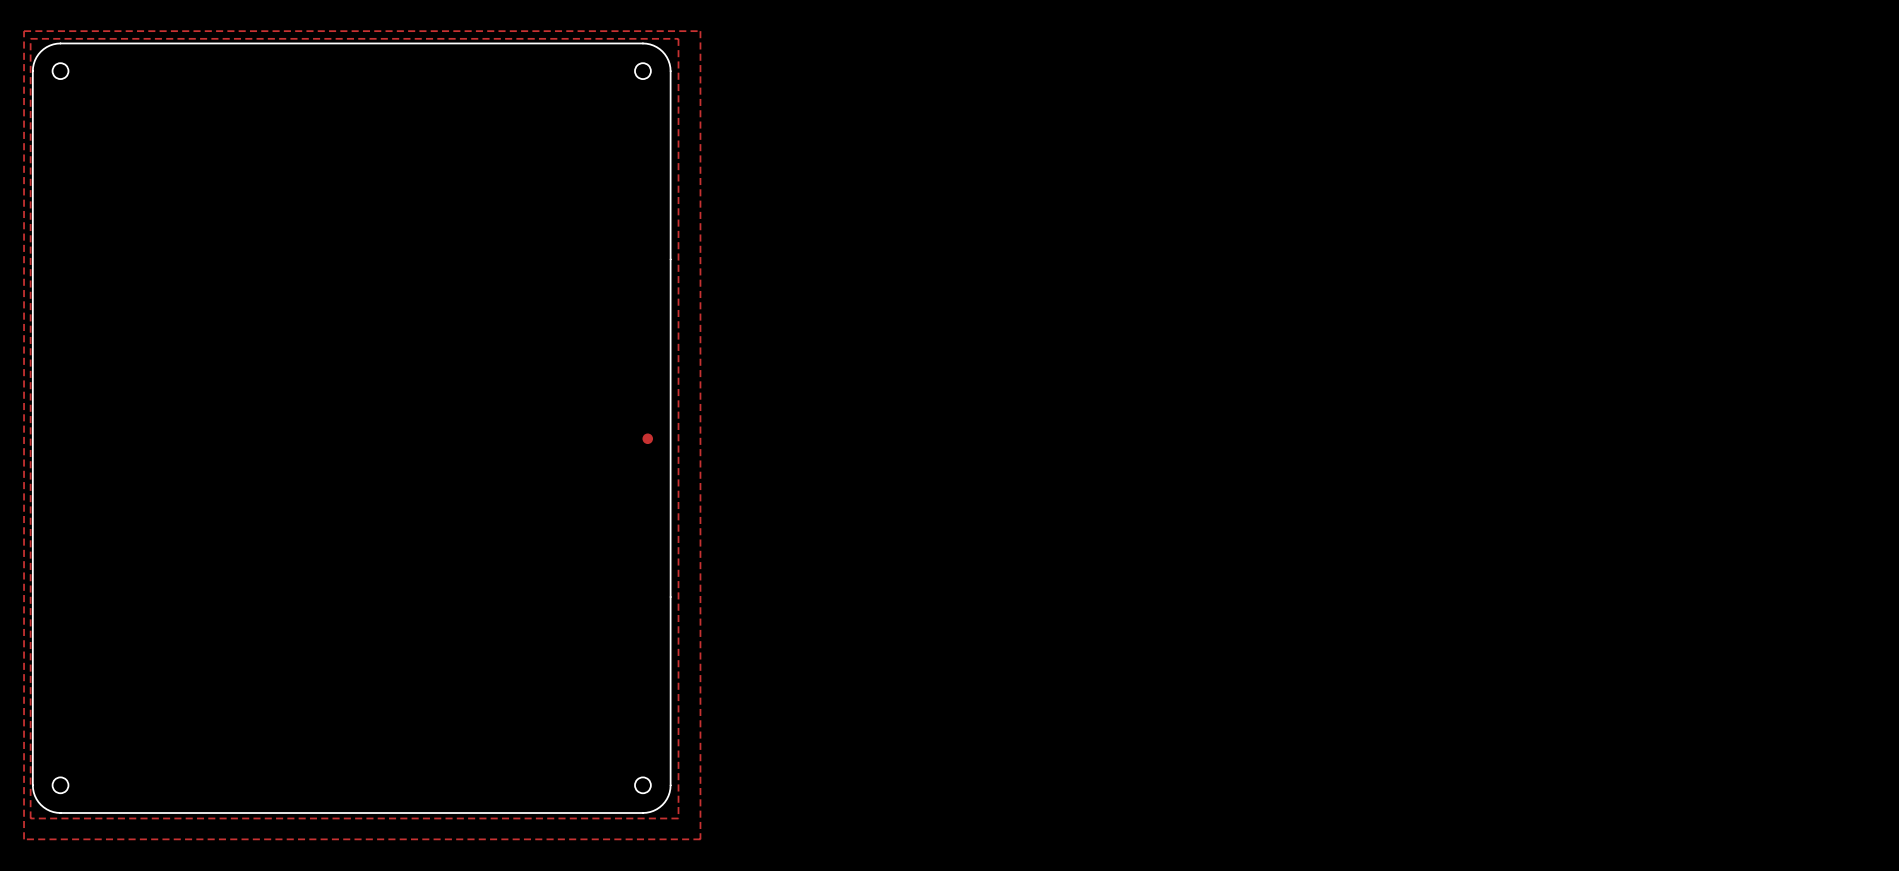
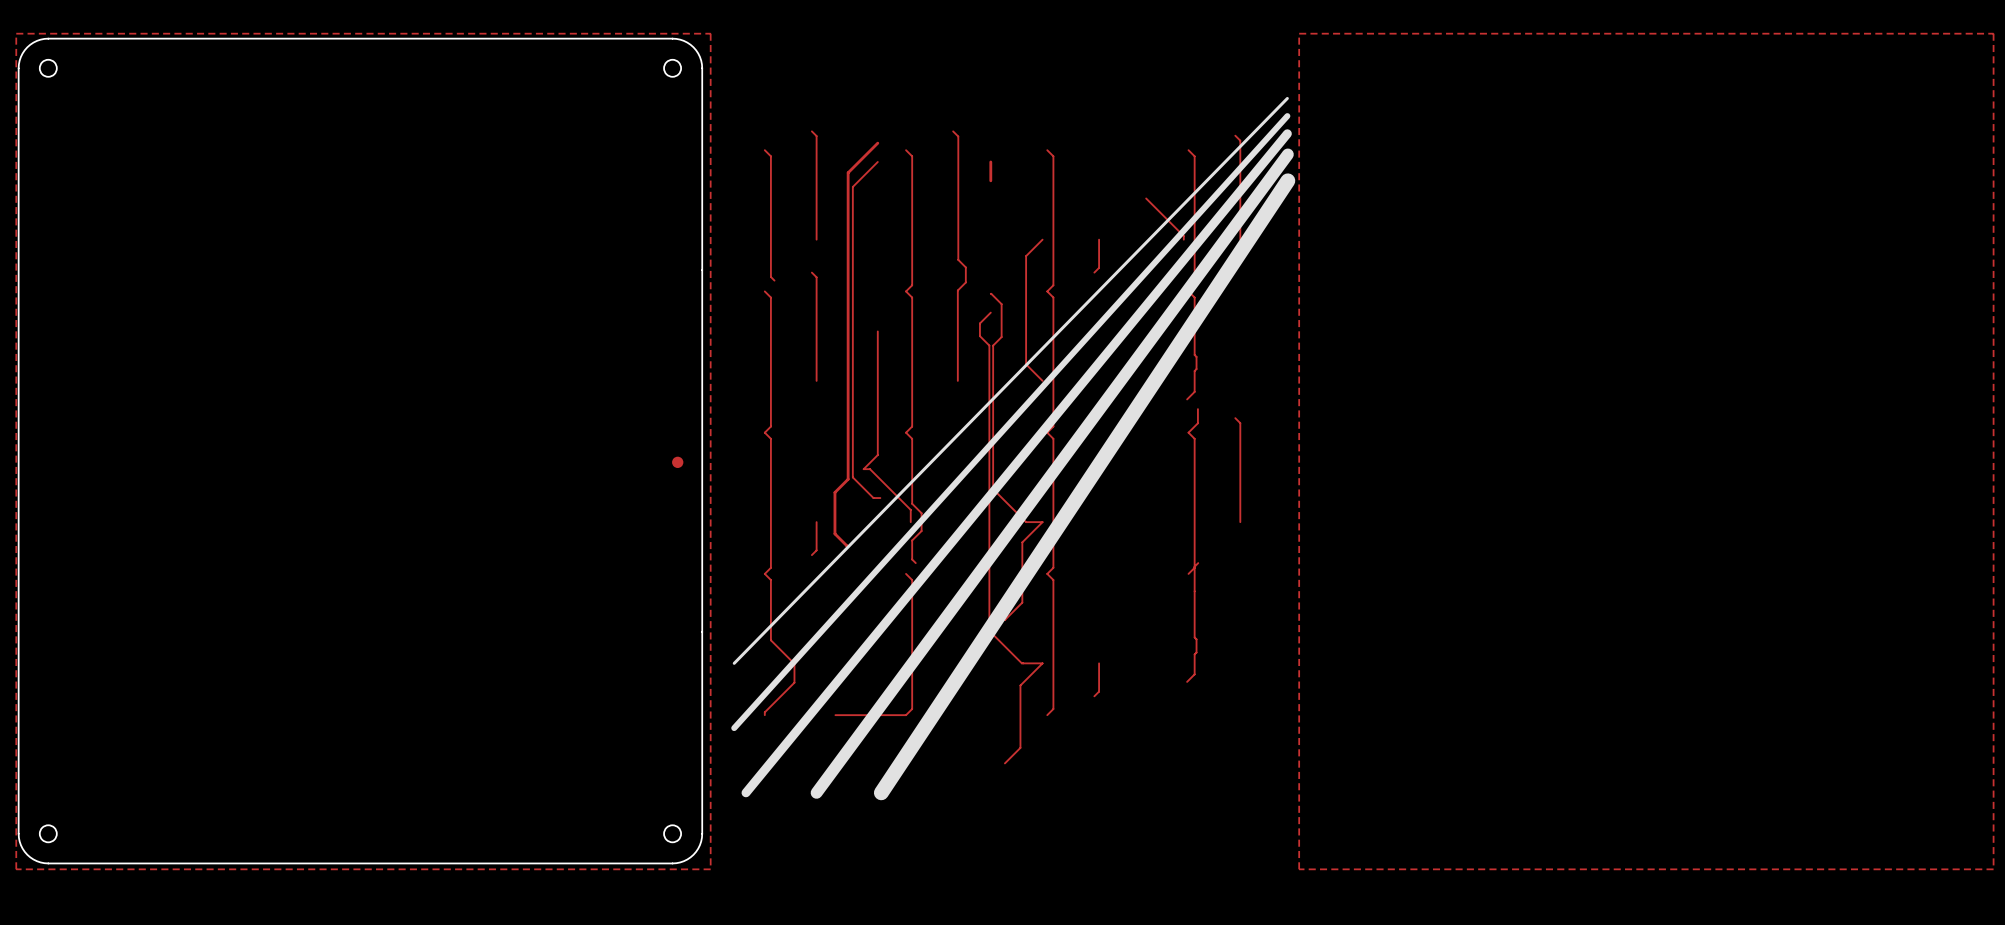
zone outline: (24, 31) (24, 839) (700, 839) (700, 31) (24, 31) -> none
zone outline: none -> (1299, 33) (1993, 33) (1993, 869) (1299, 869) (1299, 33)
line: none -> (1287, 98) (734, 663)
line: none -> (1287, 116) (734, 728)
track: none -> (811, 131) (816, 136) (816, 239)
track: none -> (953, 131) (958, 136) (958, 259) (965, 267) (965, 282) (957, 290) (957, 380)
line: none -> (1287, 133) (745, 792)
track: none -> (1235, 135) (1240, 140) (1240, 239)
track: none -> (877, 143) (848, 172) (848, 479) (834, 492) (834, 533) (847, 546)
track: none -> (764, 150) (770, 156) (770, 277) (774, 280)
track: none -> (906, 150) (912, 156) (912, 285) (906, 291) (912, 297) (912, 426) (906, 432) (912, 438) (912, 503) (921, 513) (921, 531) (912, 540) (912, 559) (915, 563)
track: none -> (1047, 150) (1053, 156) (1053, 285) (1047, 291) (1053, 297) (1053, 426) (1047, 432) (1053, 438) (1053, 567) (1047, 573) (1053, 580) (1053, 709) (1047, 715)
track: none -> (1188, 150) (1194, 156) (1194, 285) (1188, 291) (1194, 297) (1194, 355) (1196, 356) (1196, 369) (1194, 371) (1194, 391) (1187, 399)
line: none -> (1287, 154) (816, 792)
track: none -> (877, 161) (852, 186) (852, 477) (873, 498) (880, 498)
track: none -> (990, 161) (990, 180)
line: none -> (1287, 180) (881, 792)
track: none -> (1146, 198) (1183, 236) (1183, 239)
track: none -> (1042, 239) (1026, 256) (1026, 364) (1042, 380)
track: none -> (1099, 239) (1099, 267) (1094, 272)
track: none -> (811, 272) (816, 277) (816, 380)
track: none -> (764, 291) (770, 297) (770, 426) (764, 432) (770, 438) (770, 567) (764, 573) (770, 580) (770, 640) (794, 663) (794, 682) (764, 712) (764, 715)
track: none -> (990, 293) (1001, 304) (1001, 337) (993, 345) (993, 489) (1026, 522) (1042, 522) (1022, 542) (1022, 602) (1004, 619)
track: none -> (990, 312) (979, 323) (979, 336) (989, 345) (989, 630) (1021, 663) (1042, 663) (1020, 685) (1020, 747) (1004, 763)
track: none -> (877, 331) (877, 455) (863, 469) (870, 469) (910, 509) (910, 522)
track: none -> (1197, 409) (1197, 423) (1188, 432) (1194, 438) (1194, 637) (1196, 639) (1196, 652) (1194, 654) (1194, 674) (1187, 681)
track: none -> (1235, 418) (1240, 423) (1240, 522)
track: none -> (816, 522) (816, 550) (811, 555)
track: none -> (1198, 563) (1194, 566)
track: none -> (1194, 567) (1188, 573)
track: none -> (906, 573) (912, 580) (912, 709) (906, 715) (835, 715)
track: none -> (1099, 663) (1099, 691) (1094, 696)

